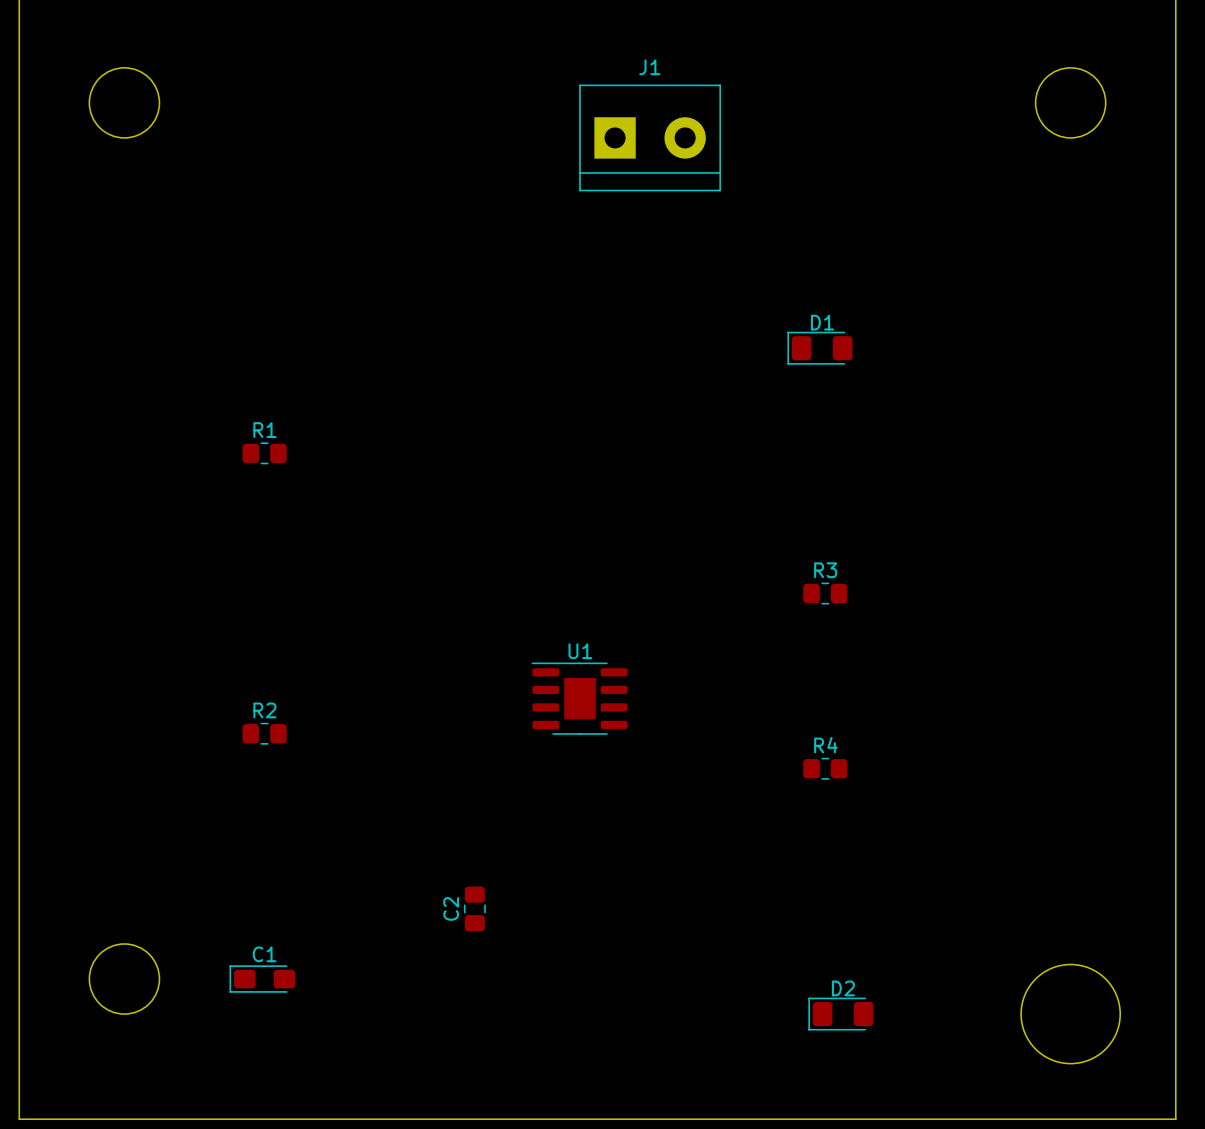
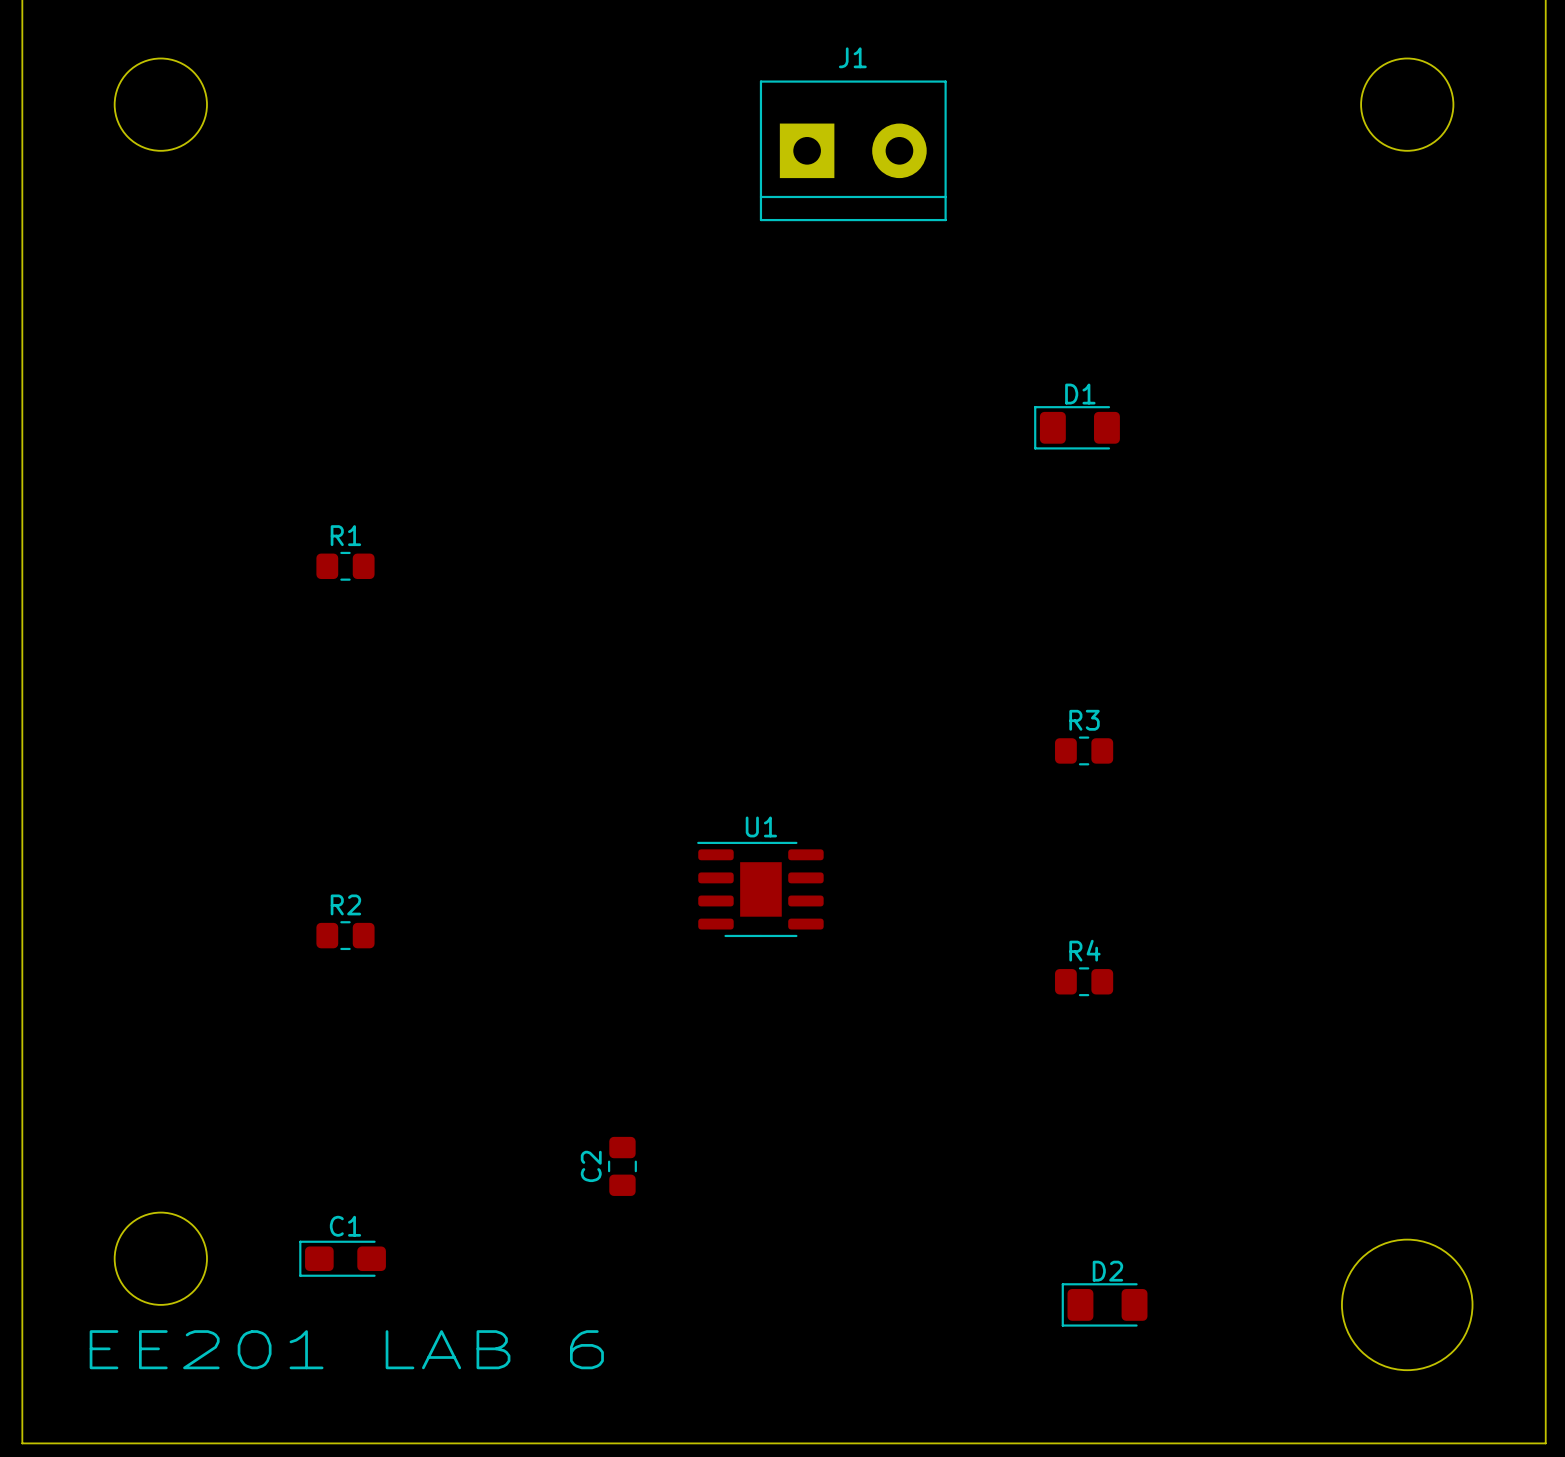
text: none -> EE201 LAB 6 (346, 1349)

